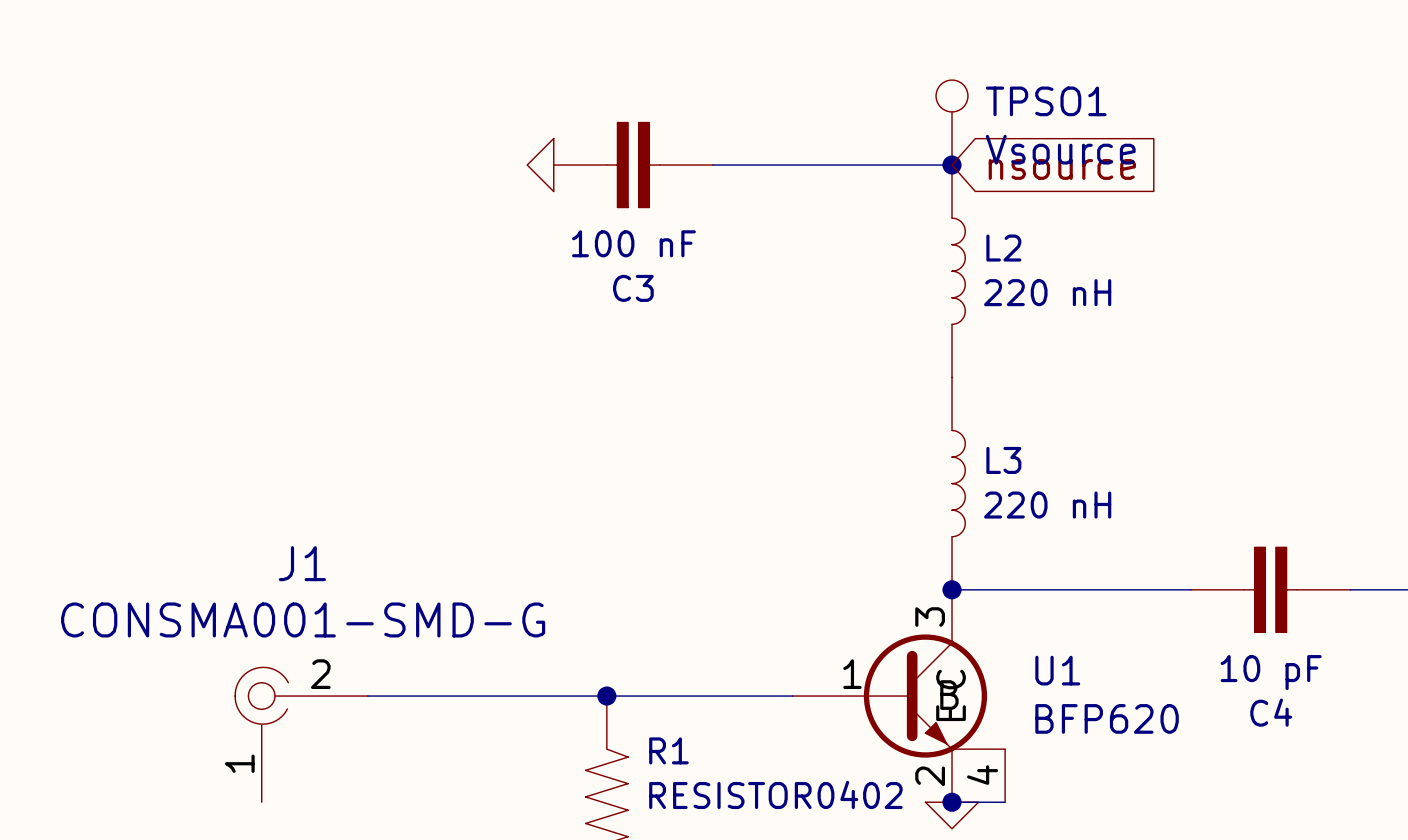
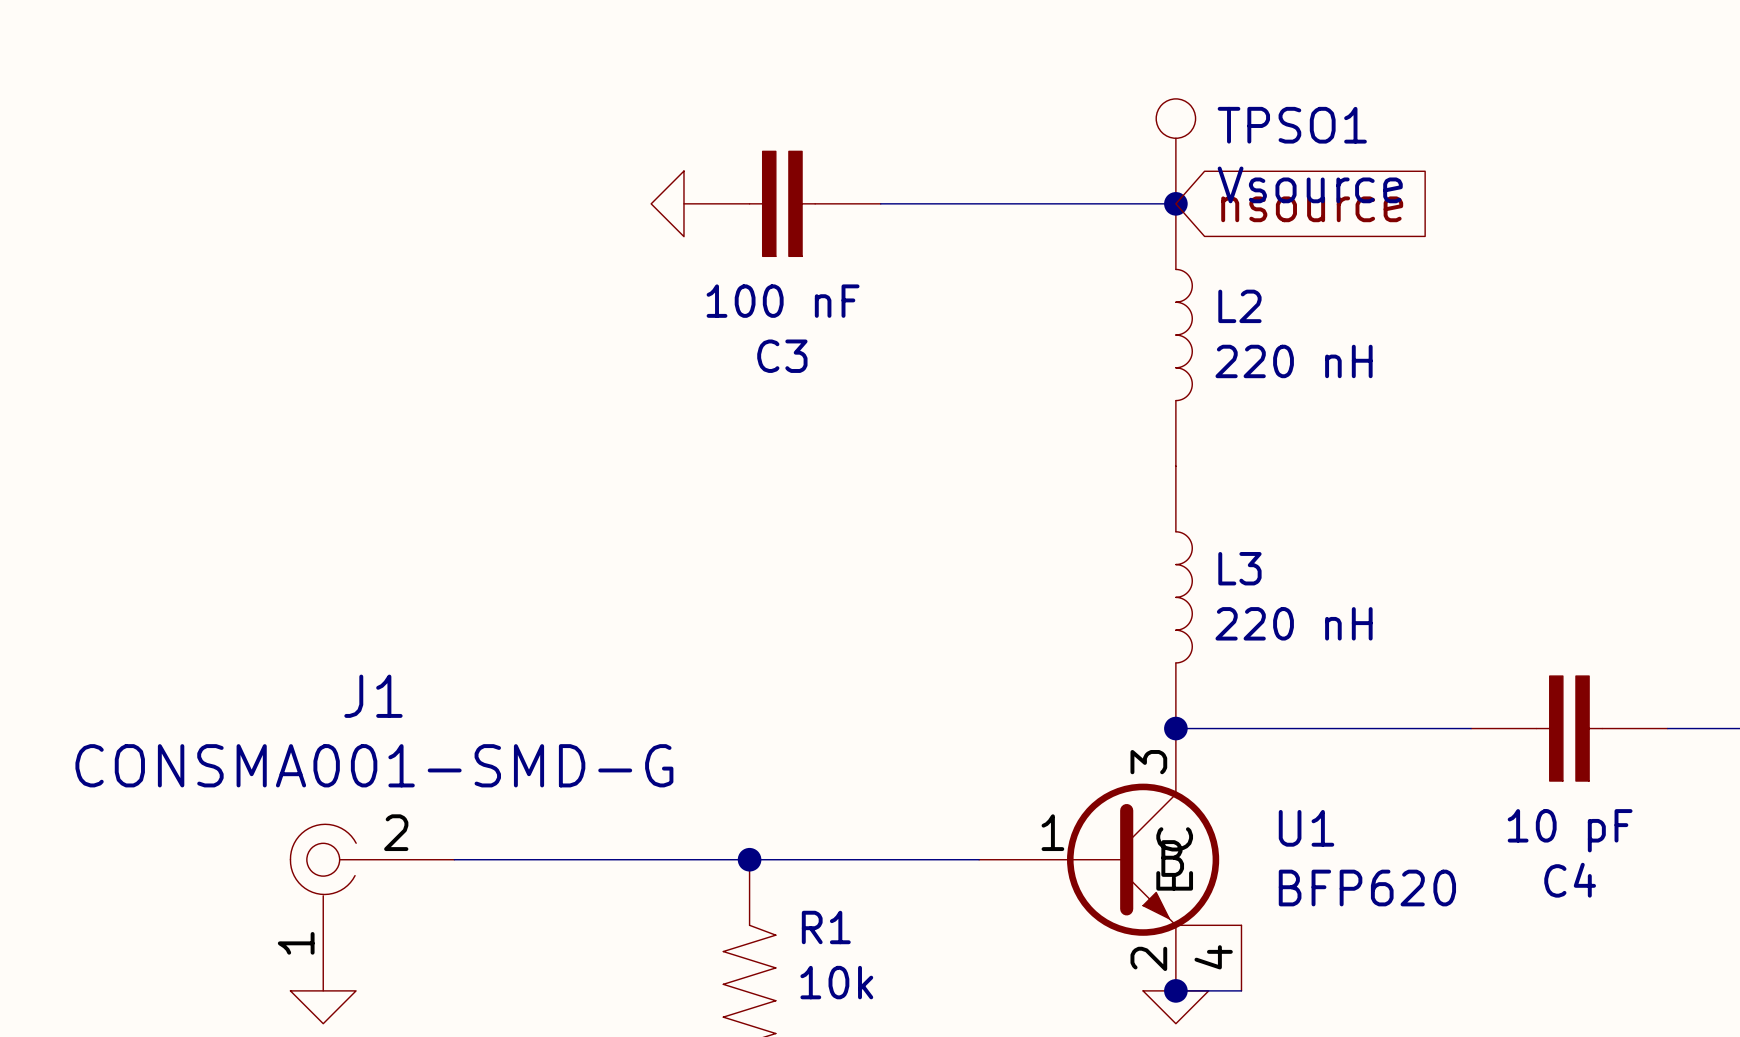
R1 value: RESISTOR0402 (775, 794) -> 10k (836, 982)
power symbol: none -> (323, 1007)

